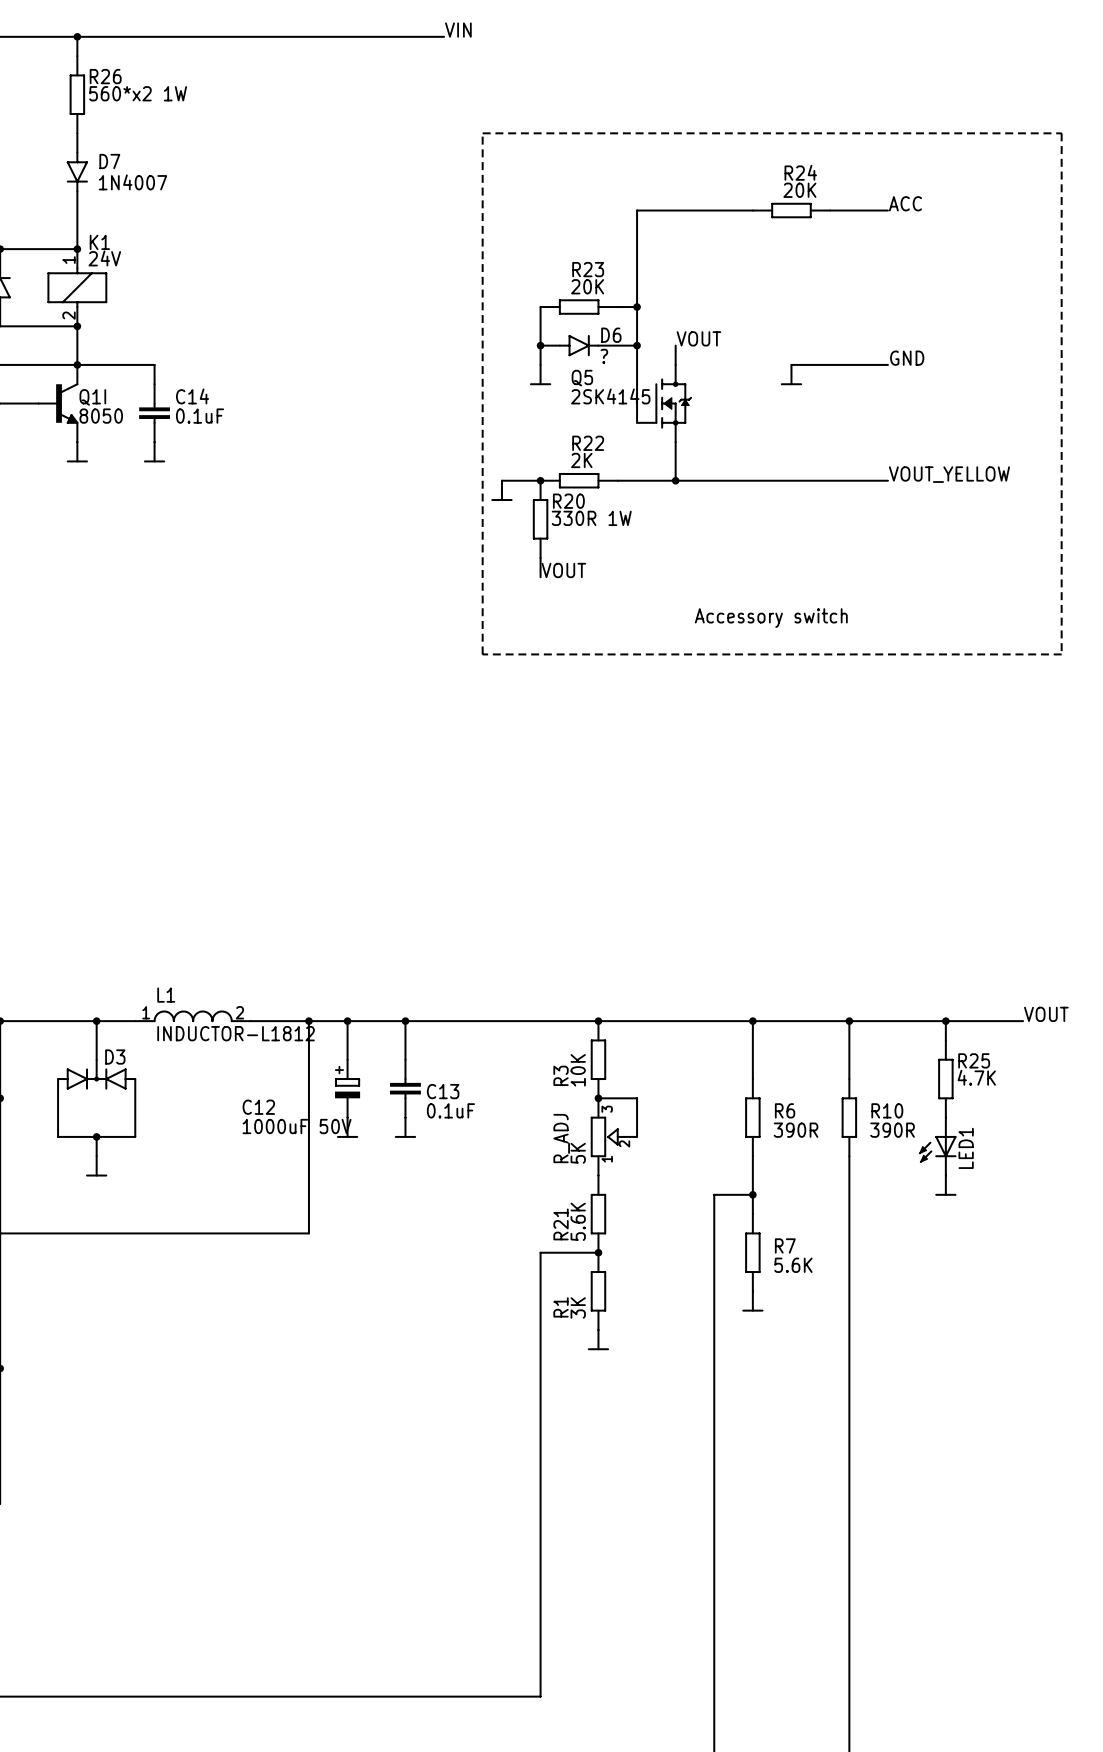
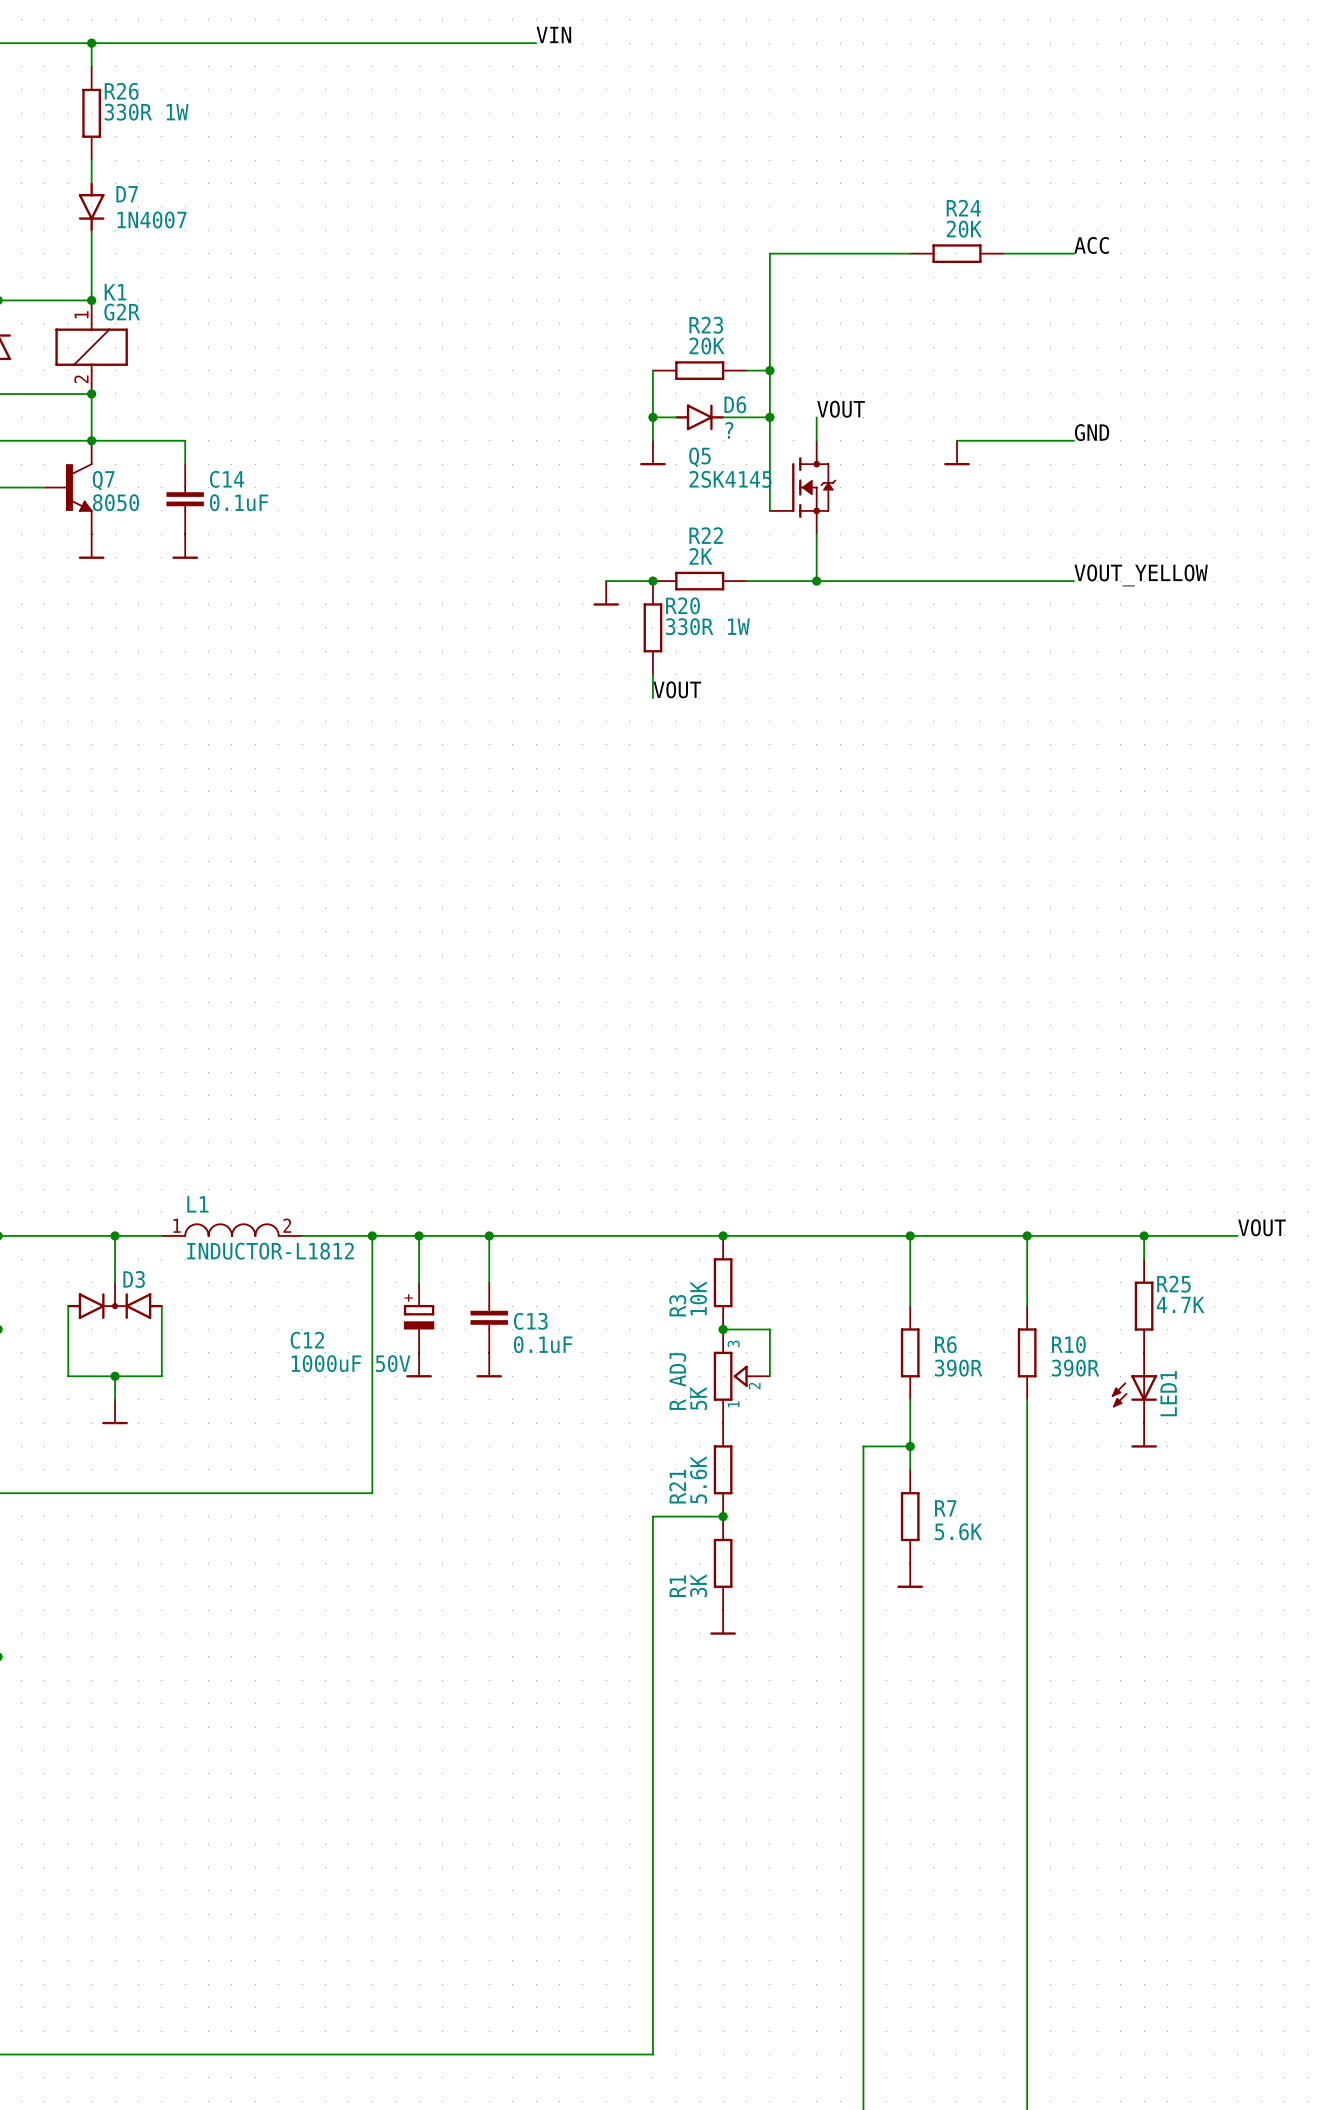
R26 value: 560*x2 1W (138, 93) -> 330R 1W (146, 112)
line: (482, 133) (1061, 133) (1061, 654) (482, 654) (482, 133) -> none
K1 value: 24V (104, 258) -> G2R (122, 312)
Q1I name: Q1I (92, 397) -> Q7 (103, 480)
text: Accessory switch (771, 618) -> none

